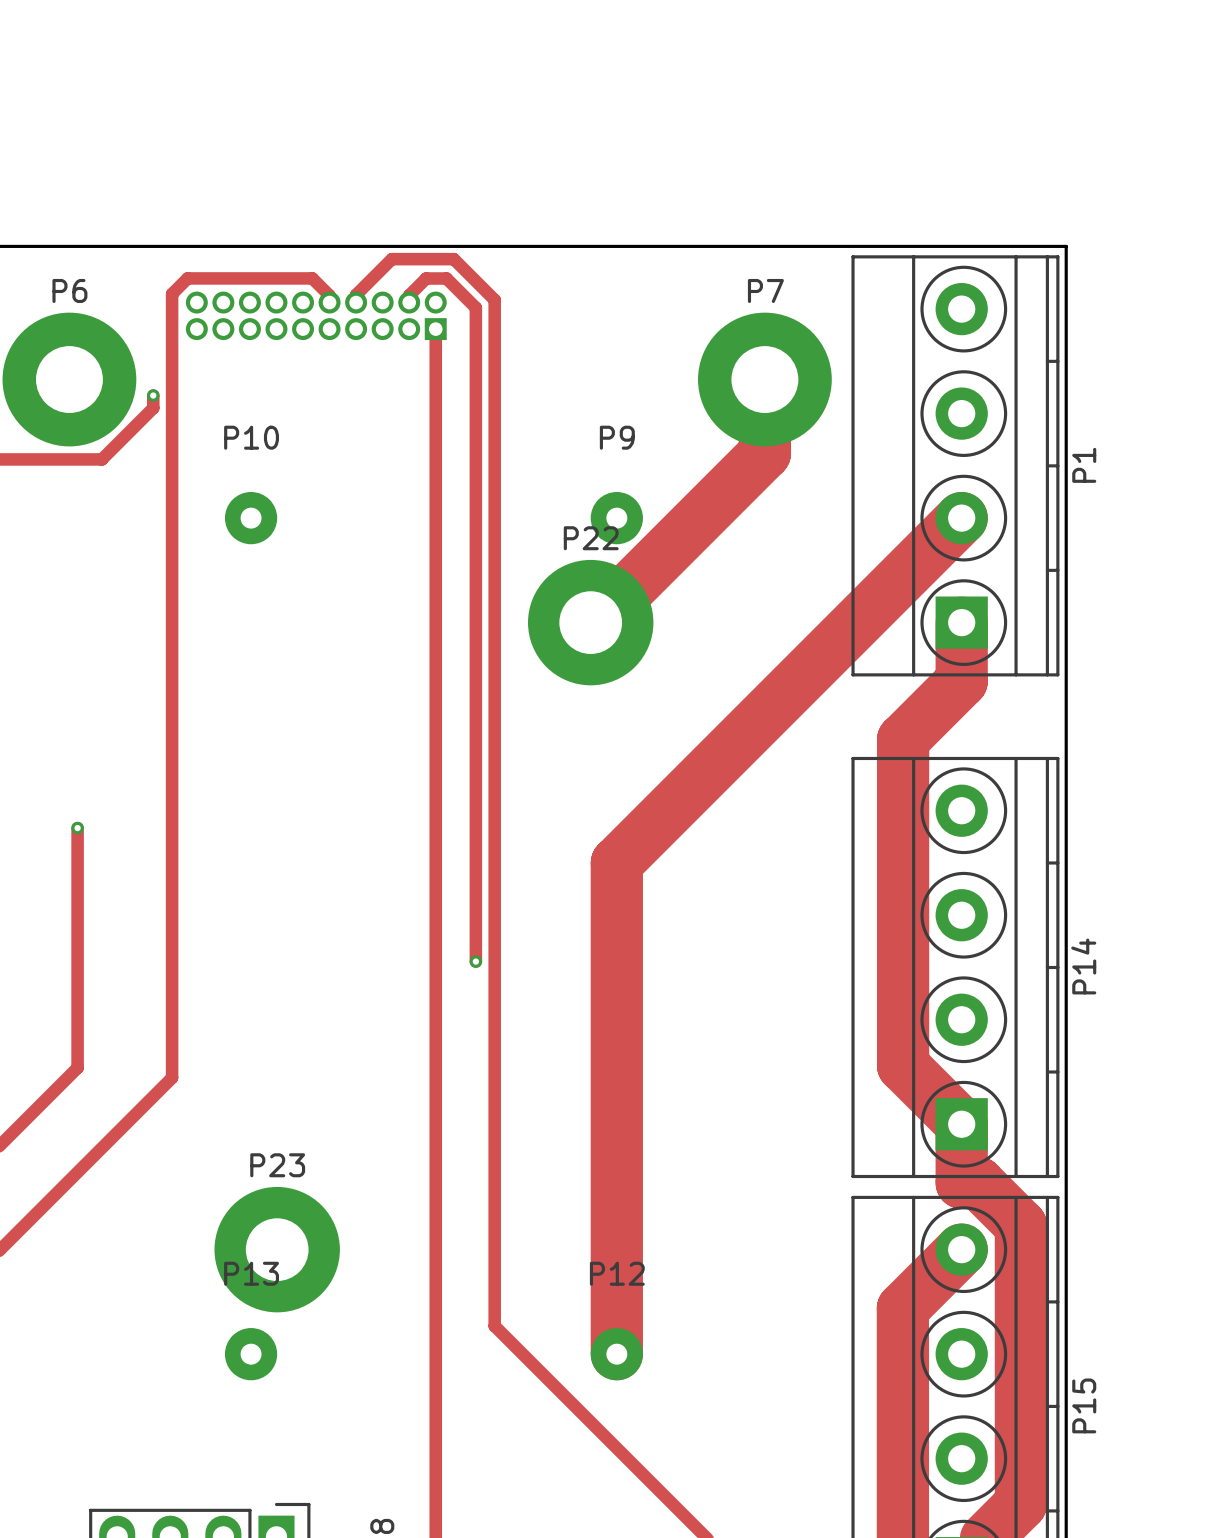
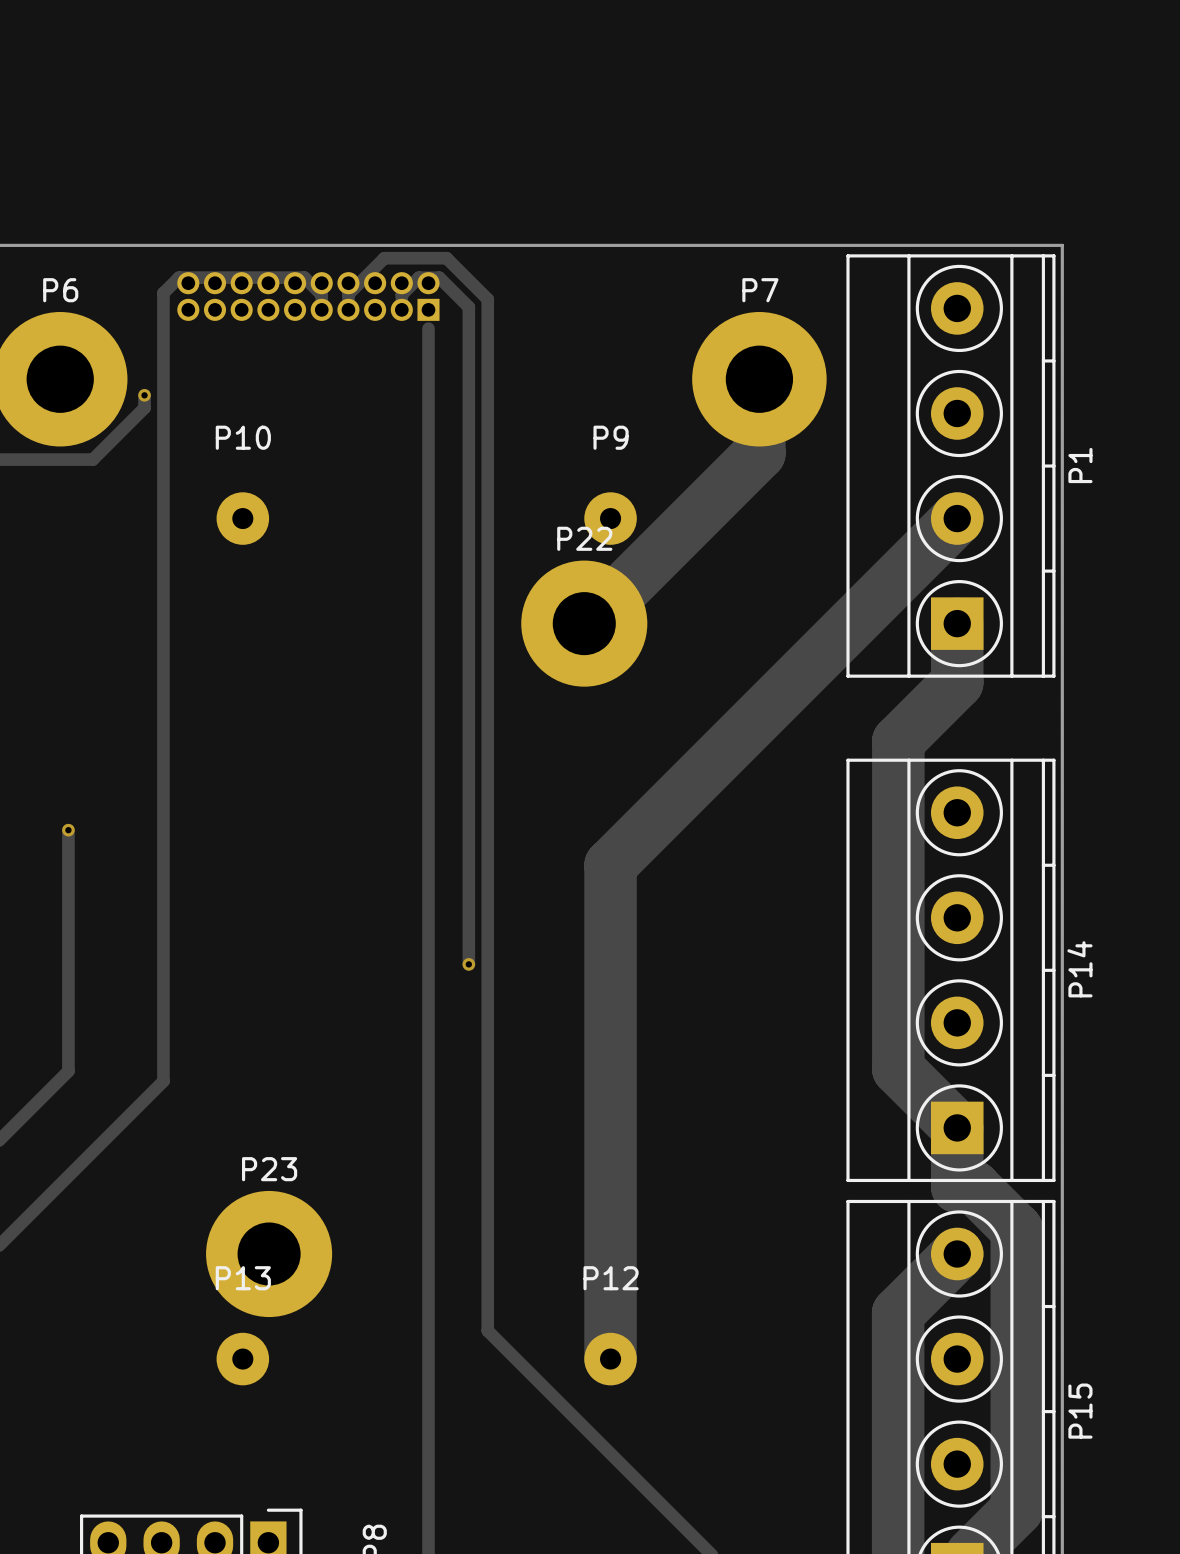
part position: (316, 315) -> (308, 296)

